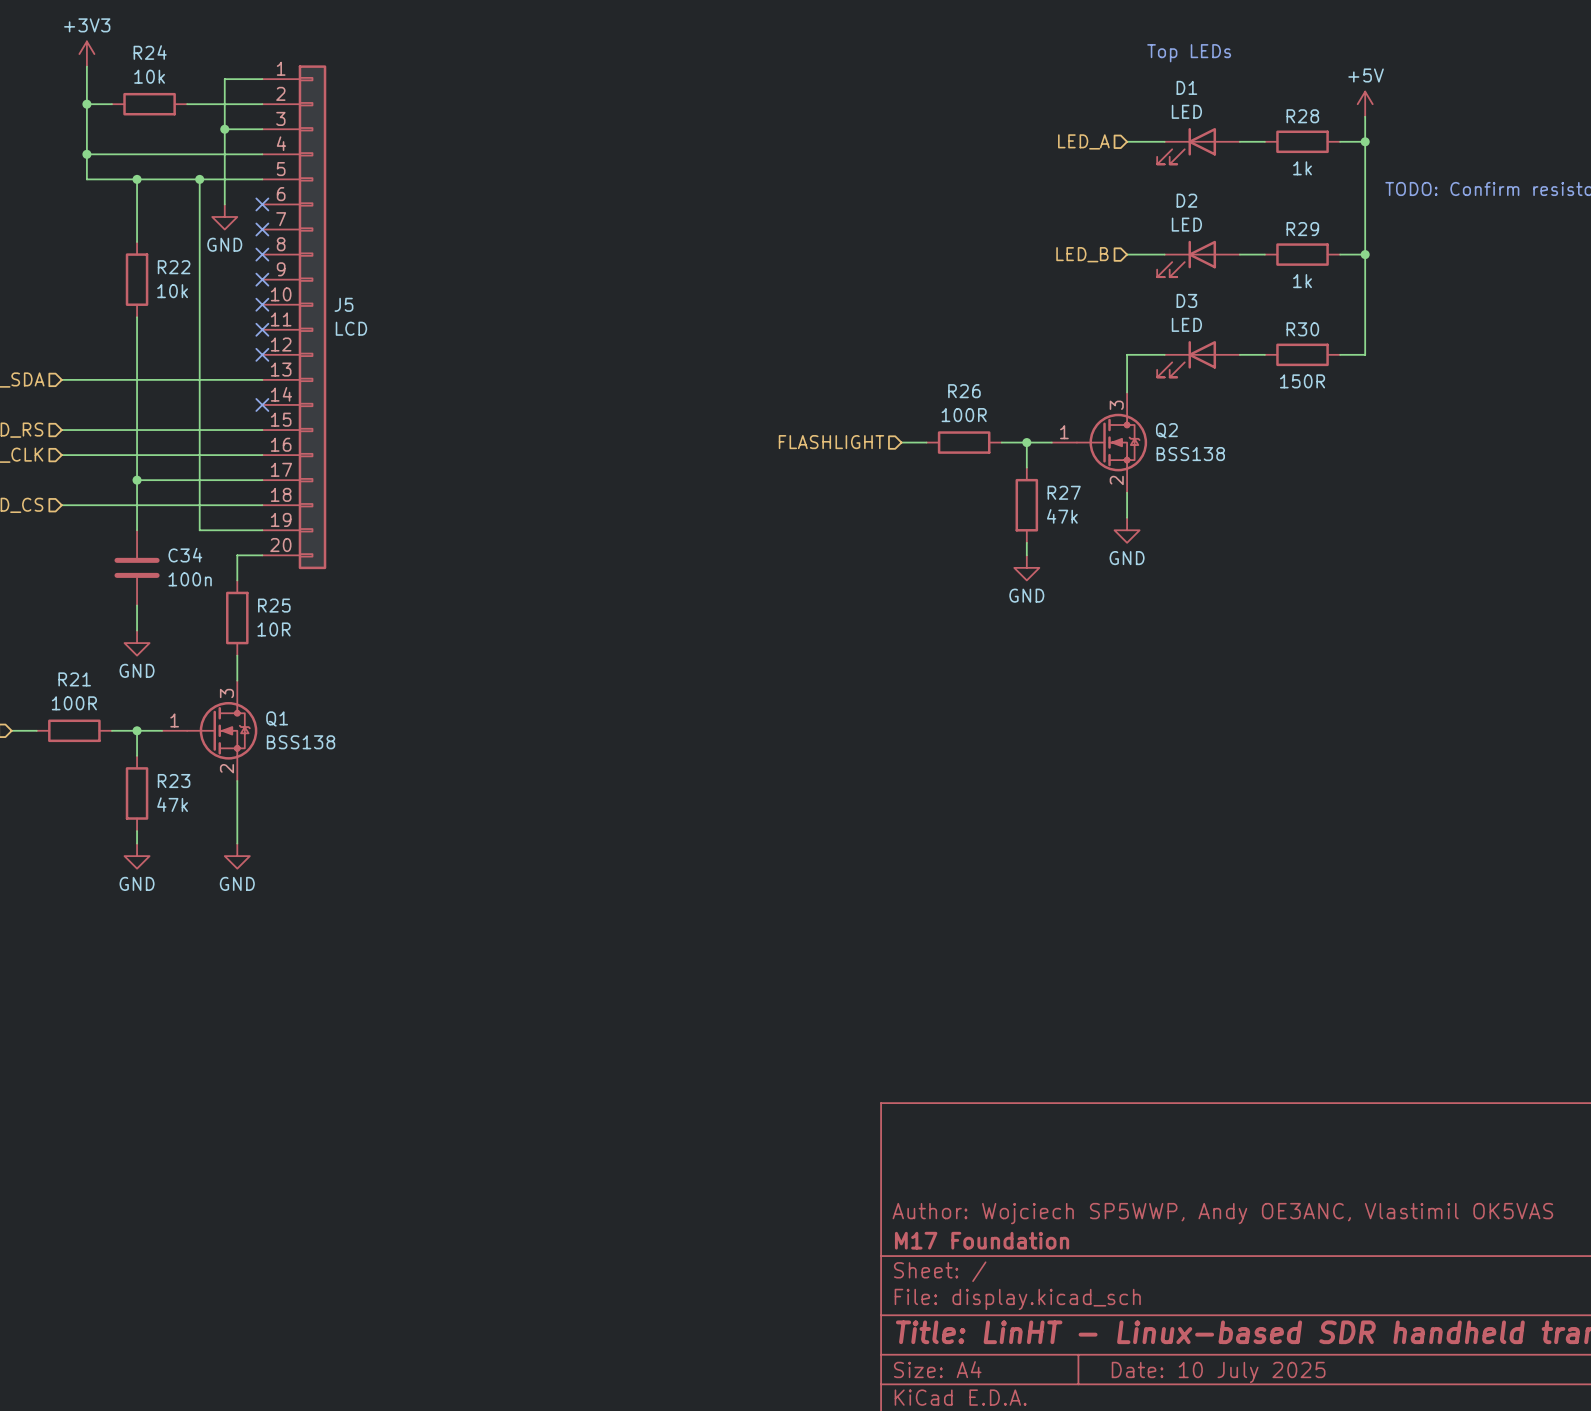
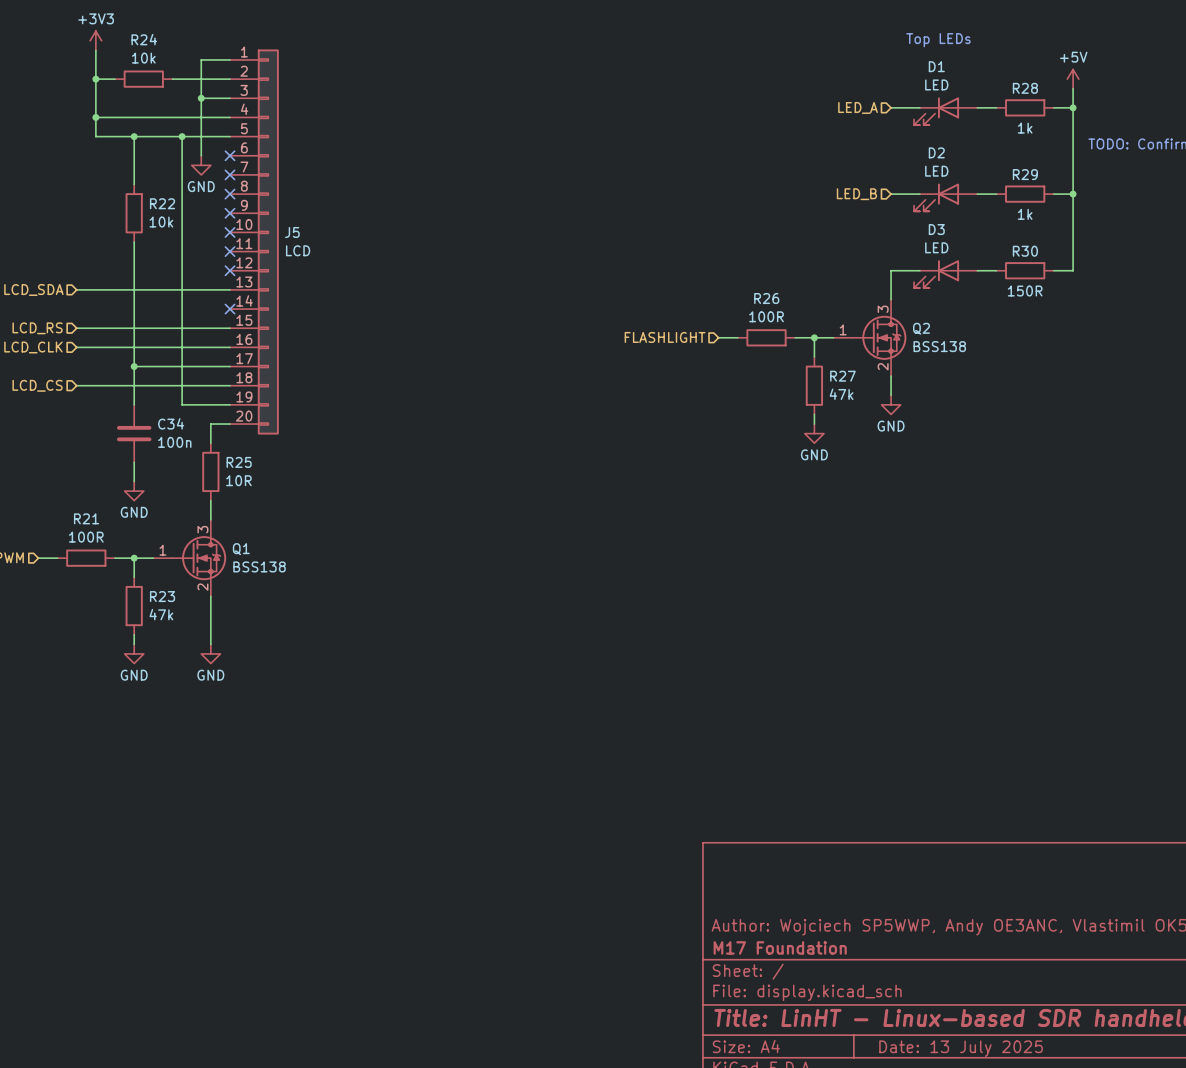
title block: Date: 10 July 2025 (1218, 1372) -> Date: 13 July 2025 (961, 1048)

